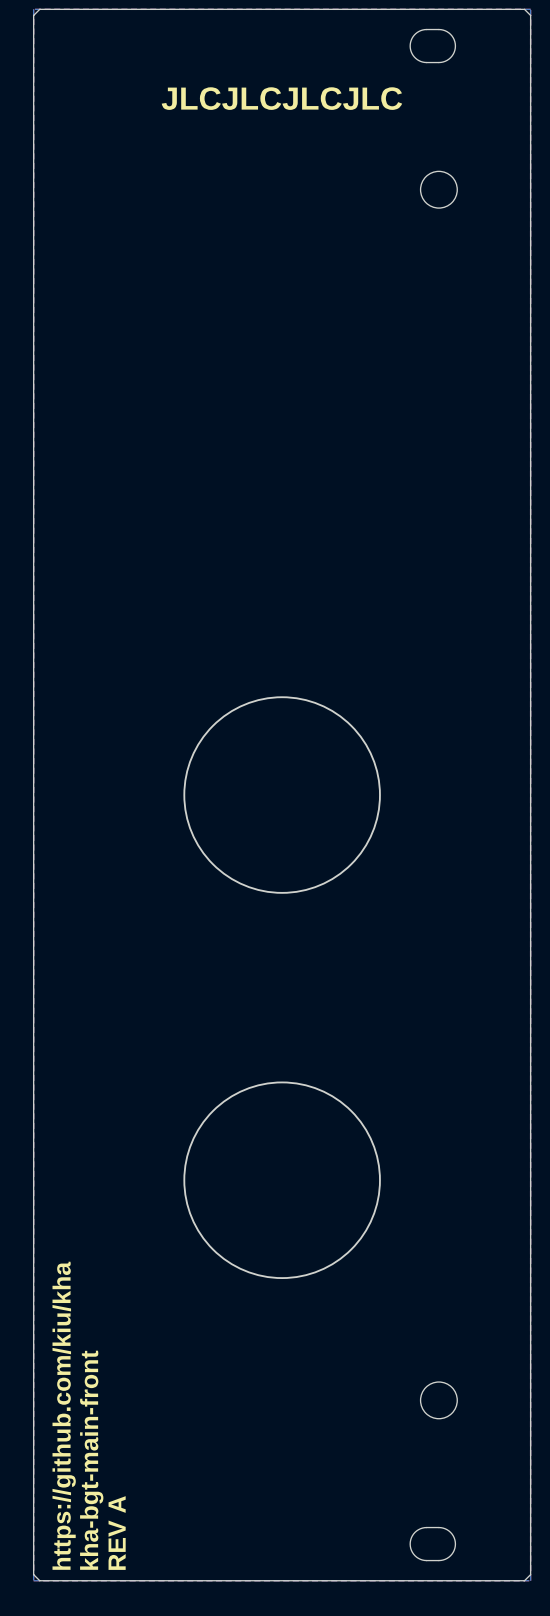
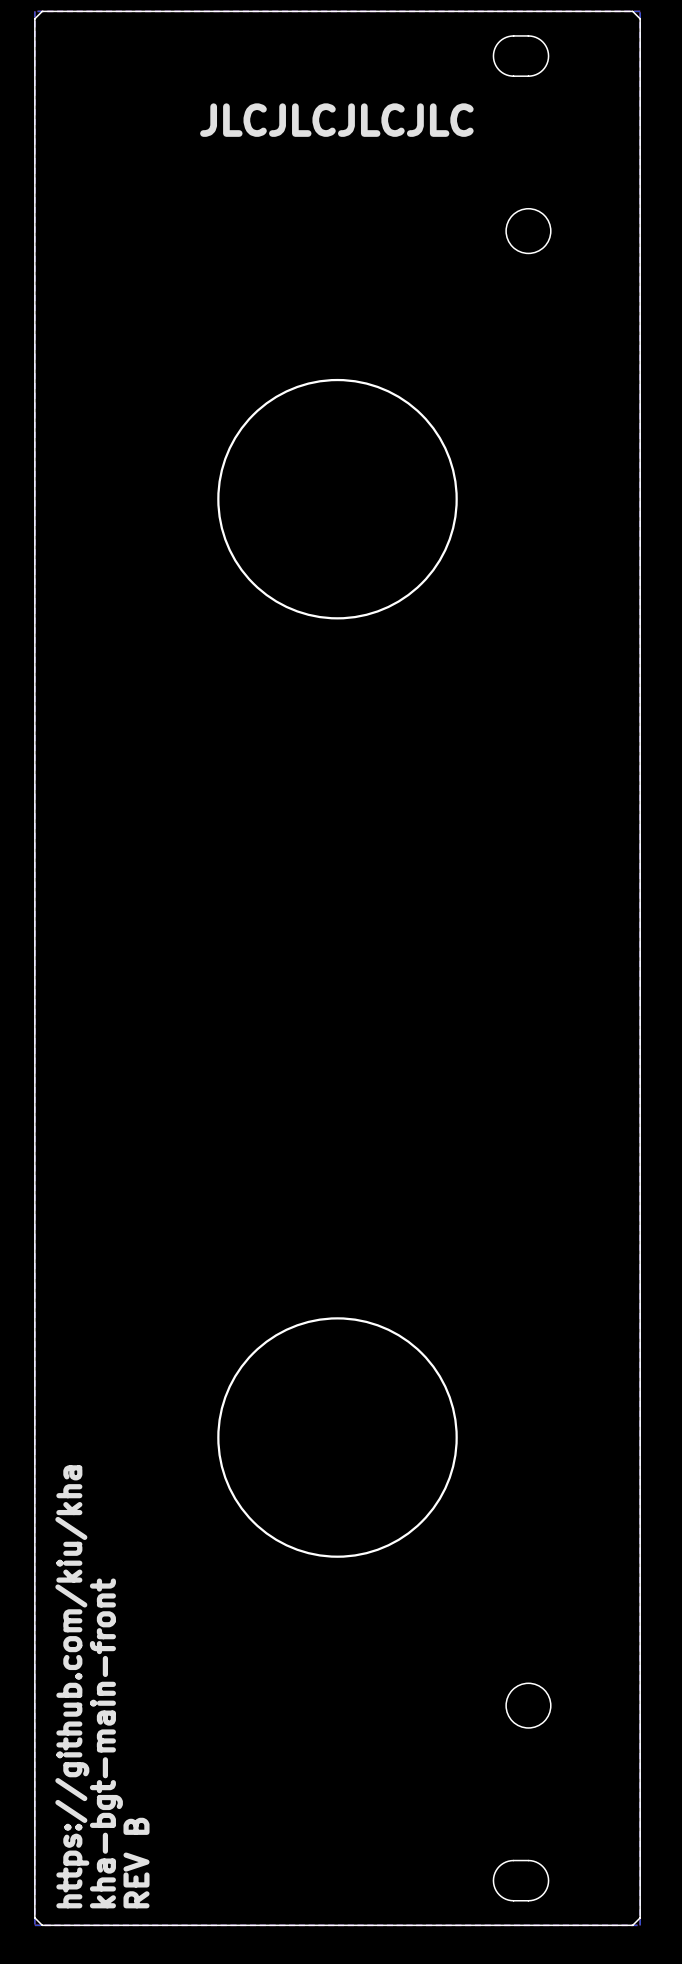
round board edge: none -> [217, 378, 458, 620]
round board edge: [183, 696, 381, 894] -> none
text: REV A (117, 1533) -> REV B (136, 1863)

